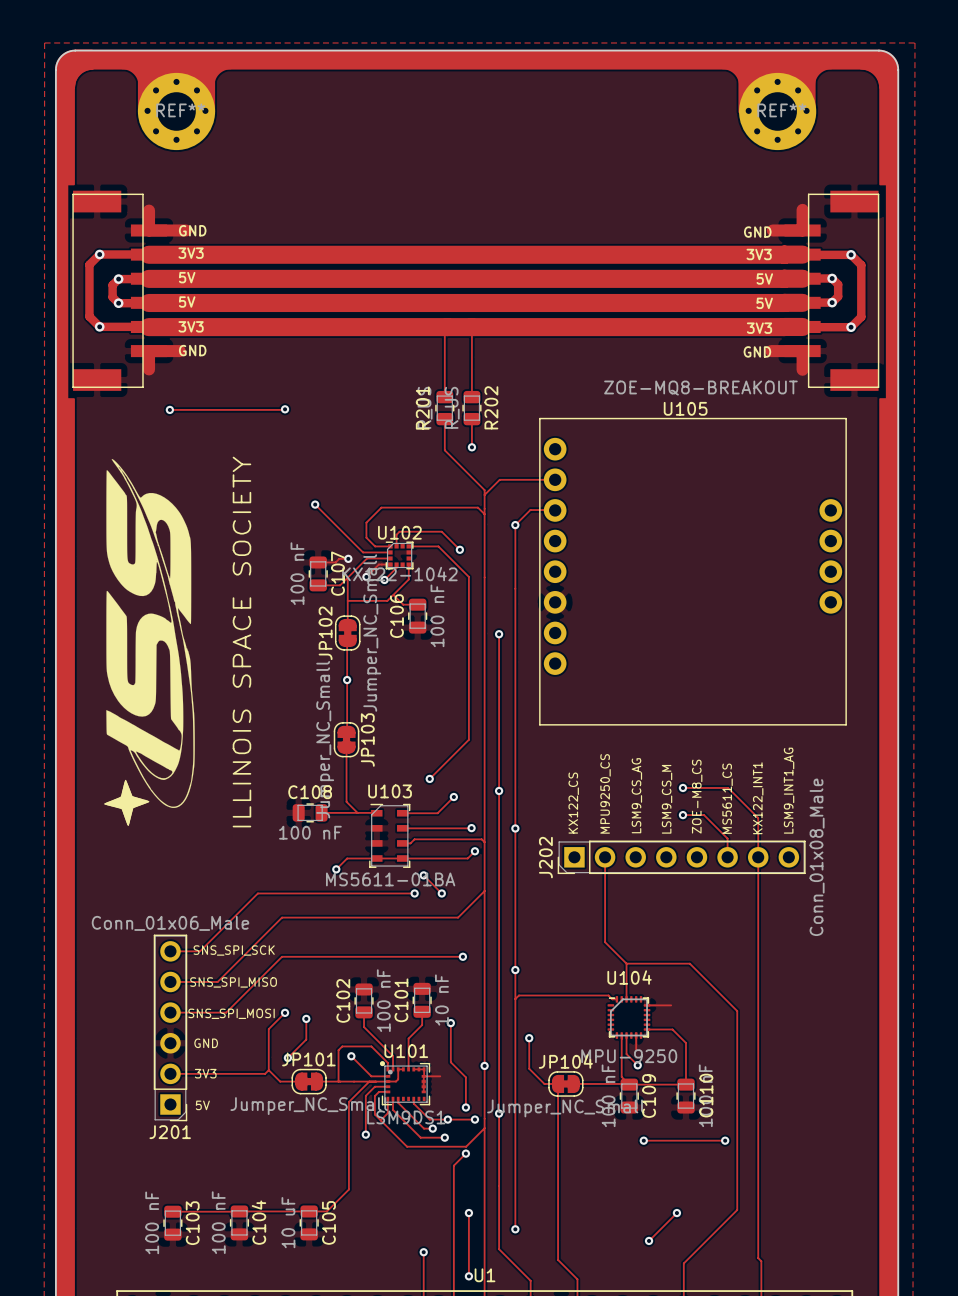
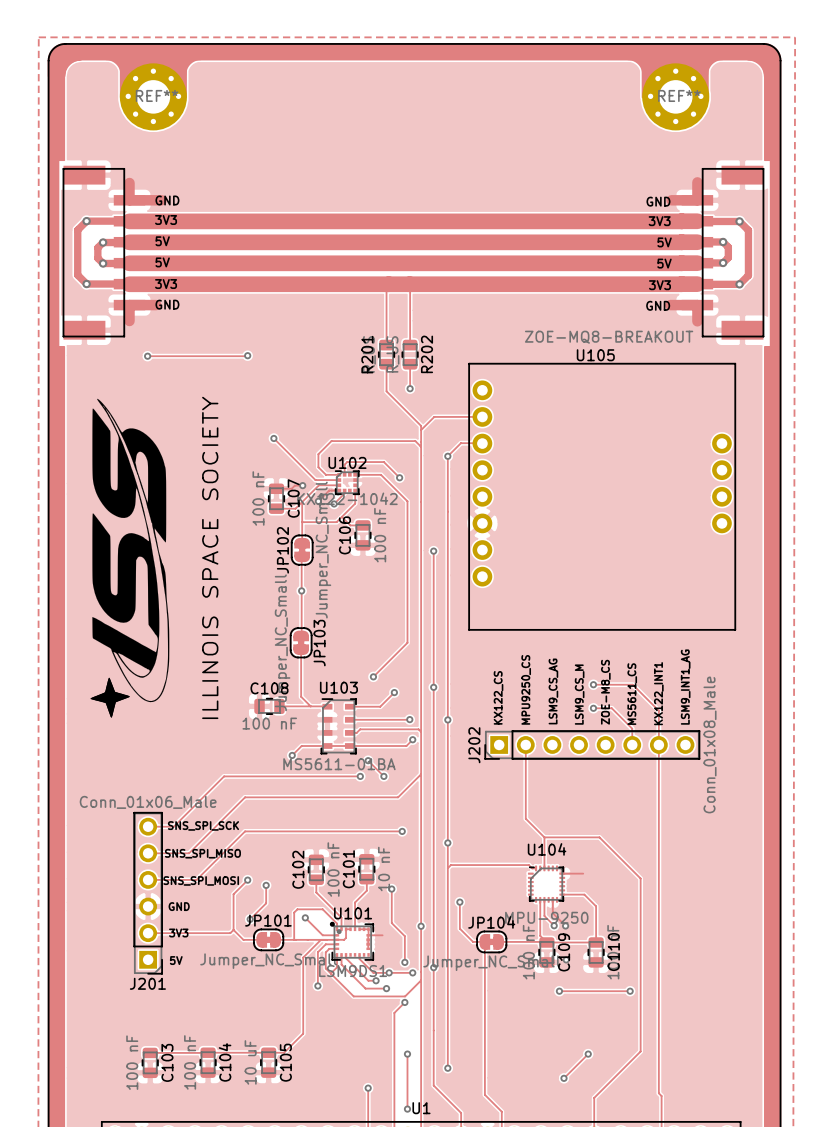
track: none -> (552, 912) (565, 925)
via: none -> (565, 925)
via: none -> (566, 959)

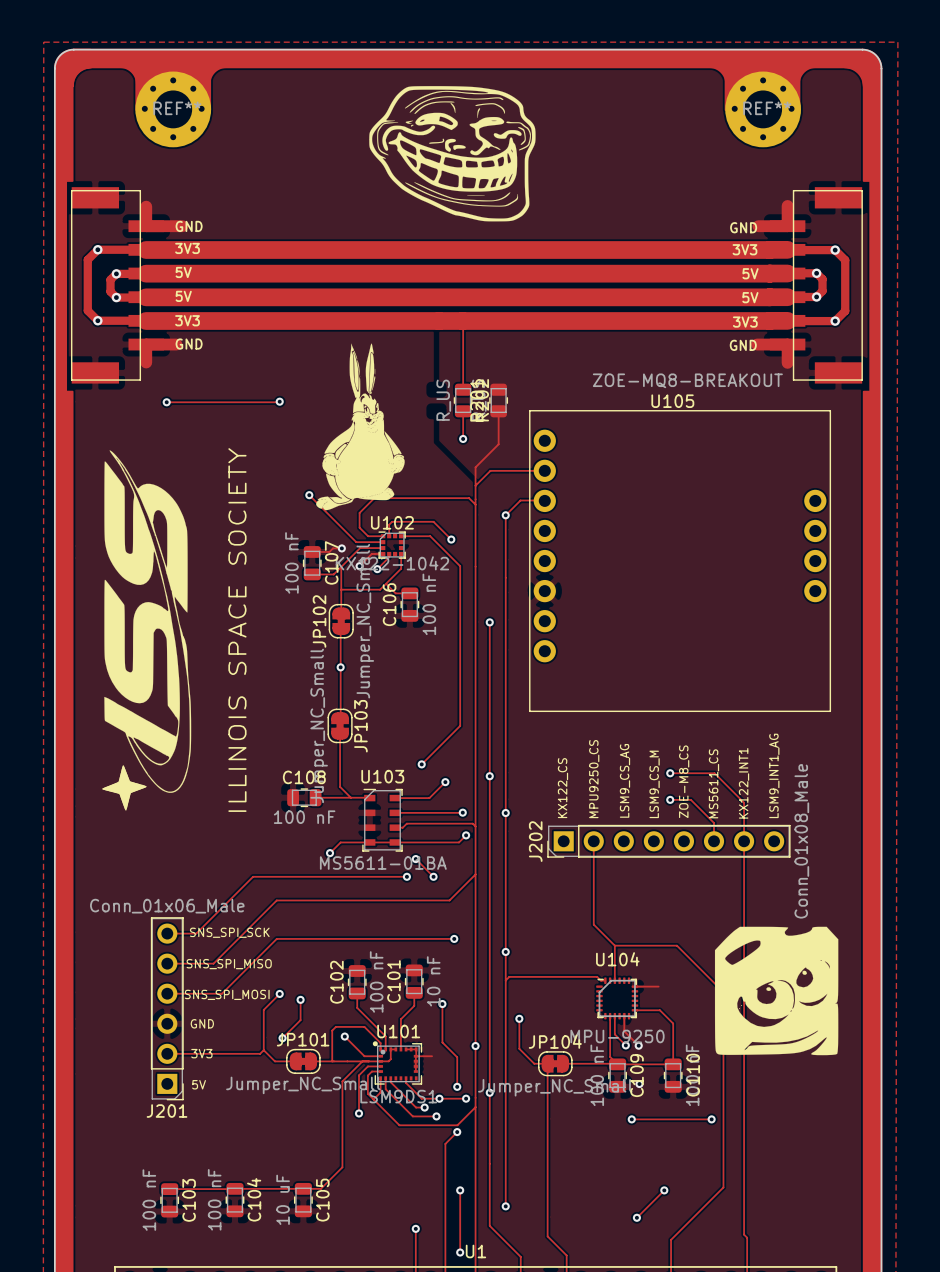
drawing: none -> [369, 86, 536, 222]
track: (386, 286) (386, 345) -> none
drawing: none -> [316, 343, 405, 511]
R201 position: (386, 354) -> (498, 400)
track: (386, 364) (386, 391) (421, 425) -> (498, 411) (498, 444) (475, 467) (475, 480)
drawing: none -> [714, 926, 839, 1056]

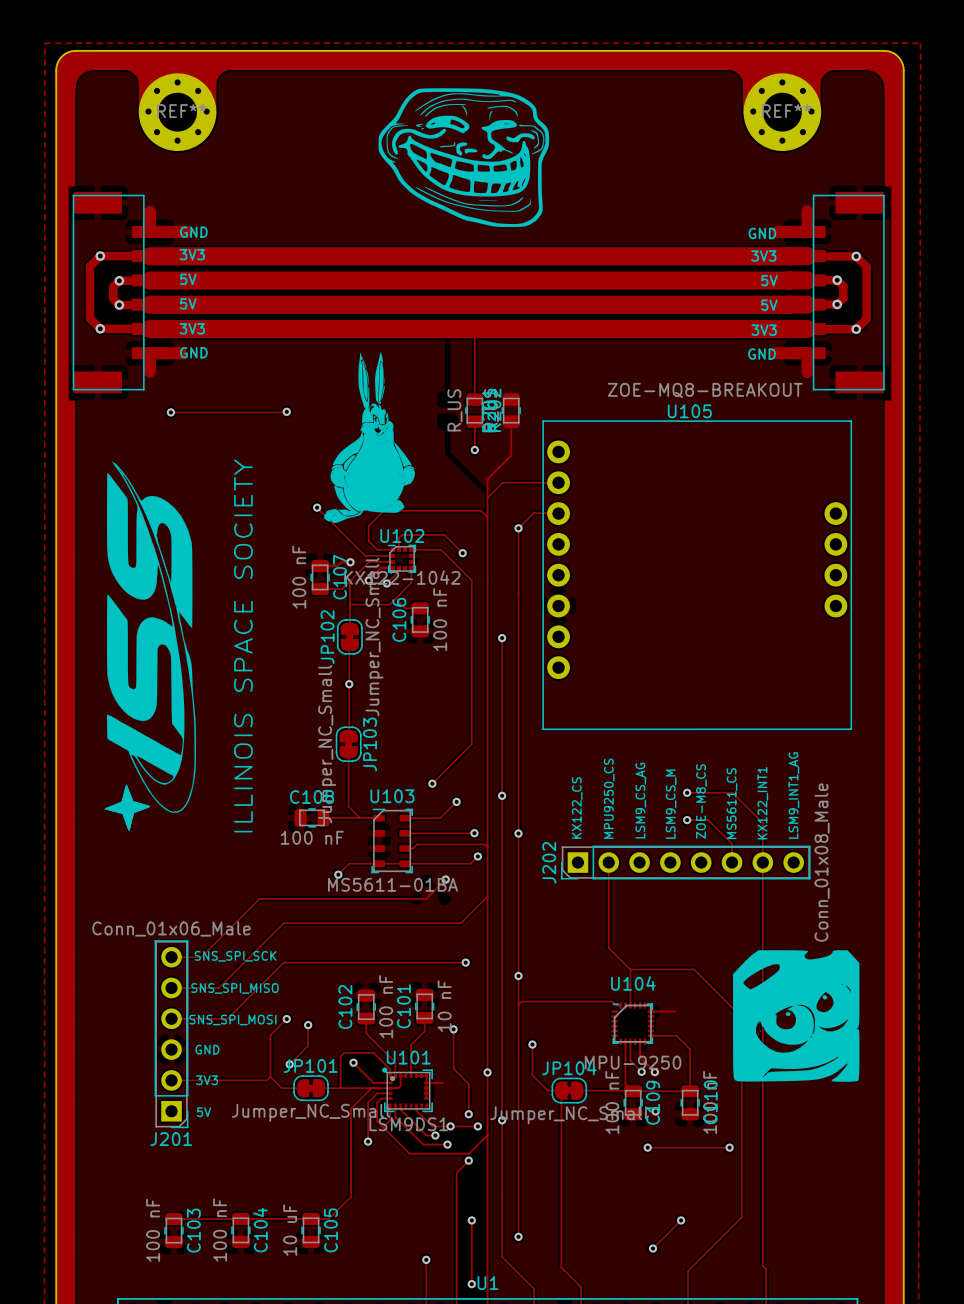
track: none -> (445, 879) (426, 898) (417, 898)
via: none -> (445, 879)
track: (415, 859) (433, 876) -> none
via: (415, 859) -> none
via: (406, 876) -> none
via: (433, 876) -> none

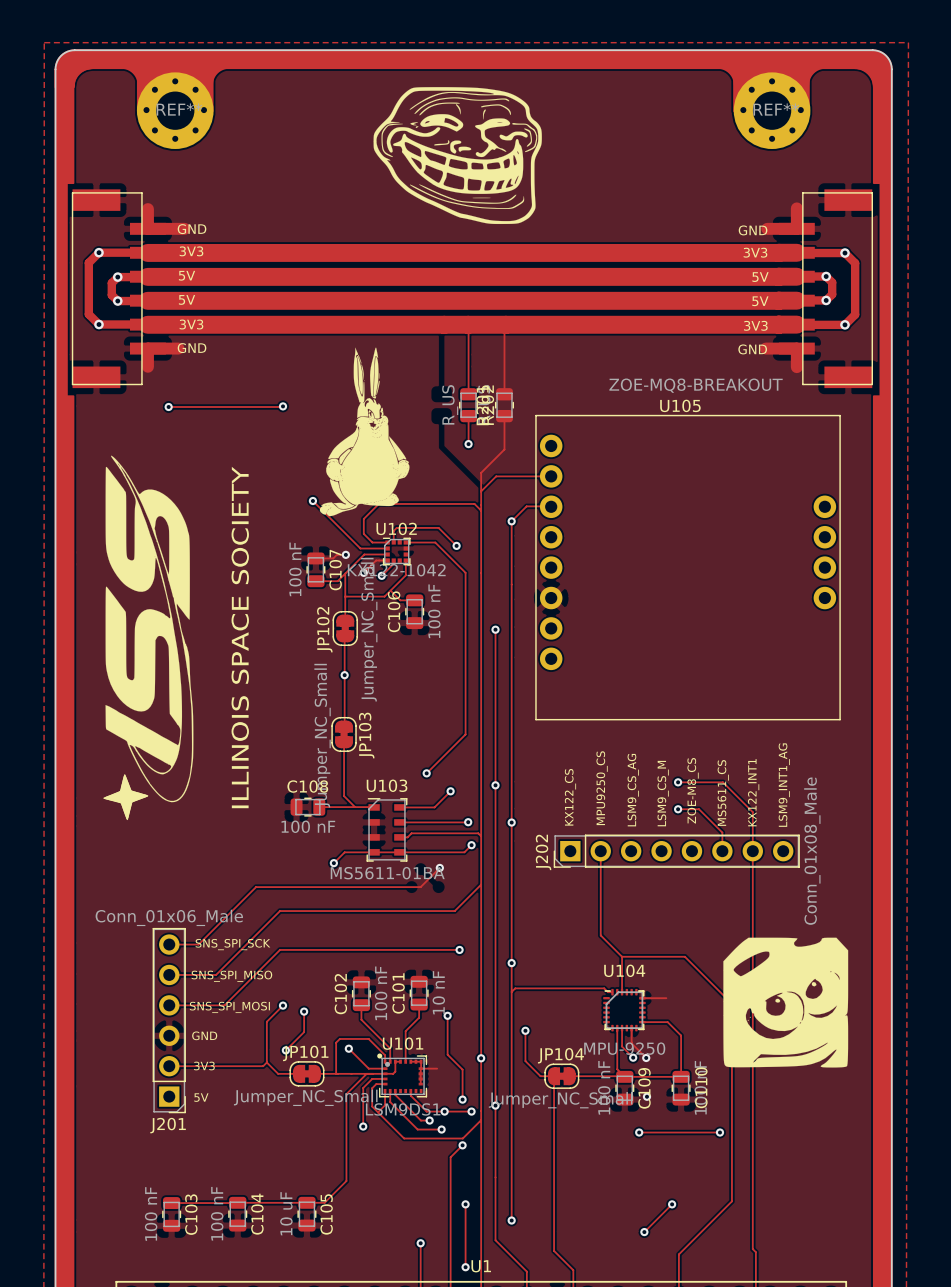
track: none -> (505, 324) (504, 394)

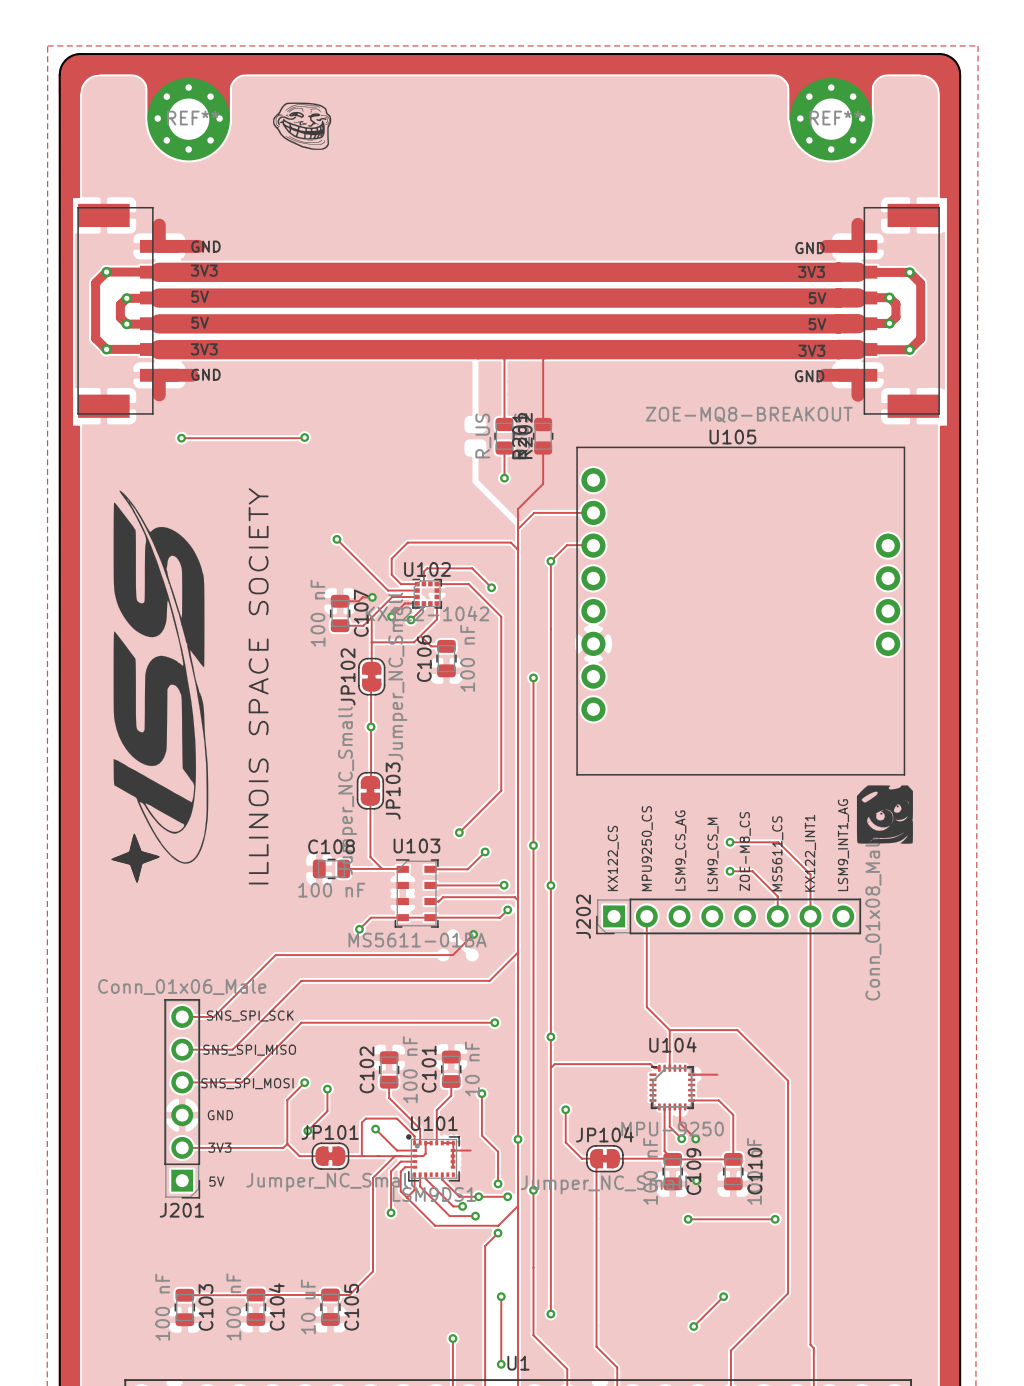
drawing: [373, 87, 542, 225] -> none
drawing: none -> [273, 102, 332, 150]
drawing: [319, 347, 410, 517] -> none
drawing: none -> [856, 785, 913, 844]
drawing: [723, 937, 849, 1068] -> none

